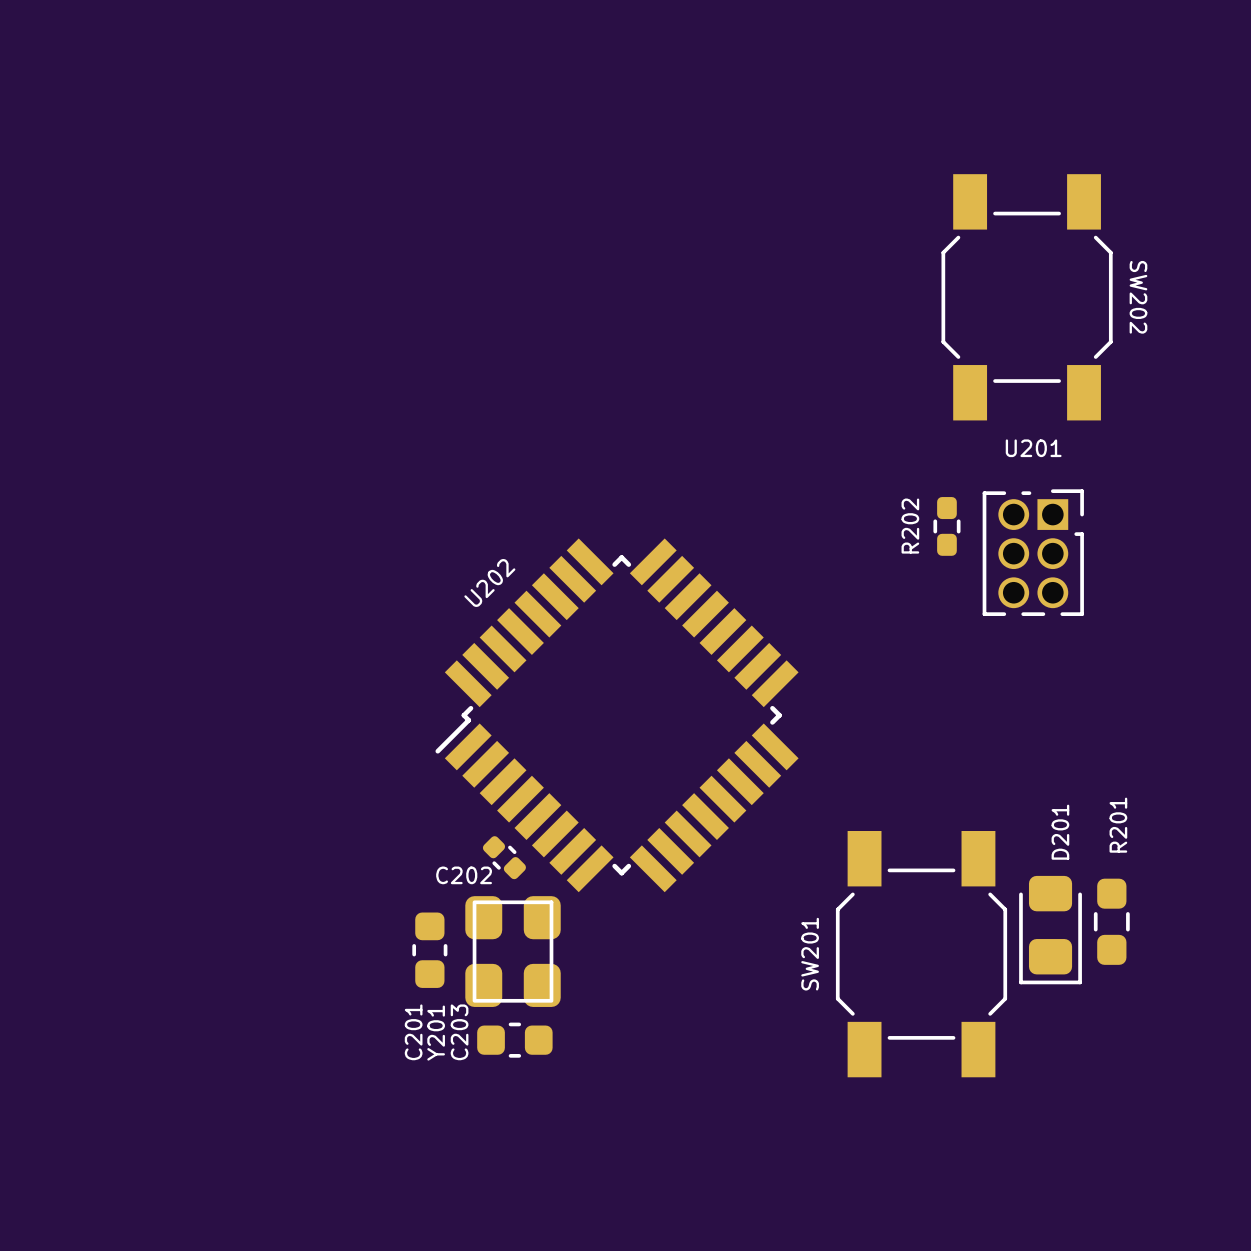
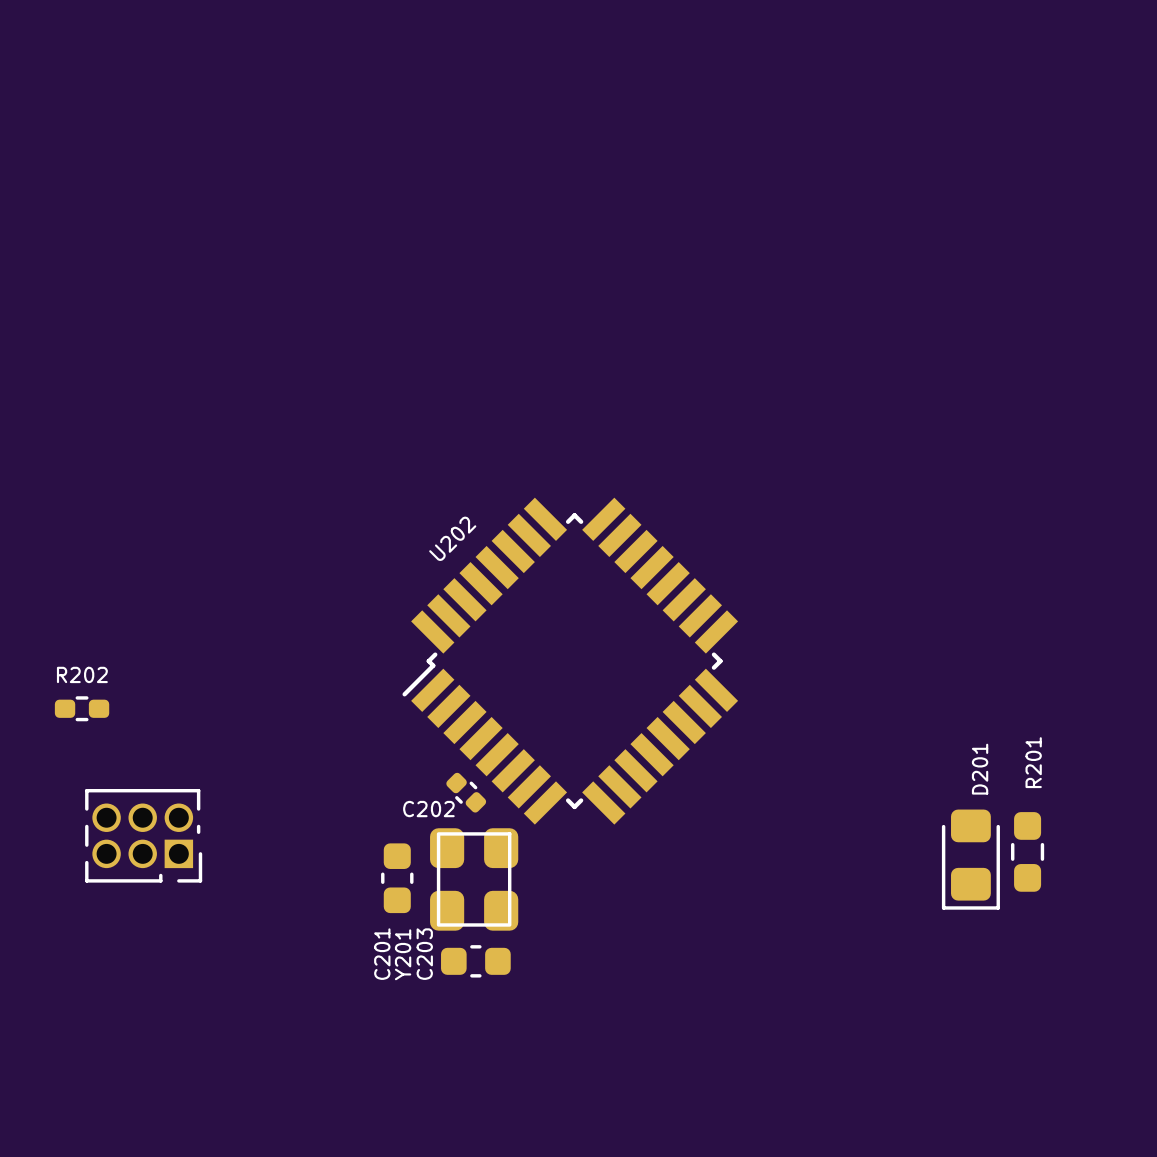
SW202: (1027, 297) -> none
R202 rotation: 0° (946, 526) -> 90° clockwise (82, 708)
R202 position: (946, 526) -> (82, 708)
U201: (1033, 552) -> none
part: none -> (143, 835)
SW201: (921, 954) -> none

